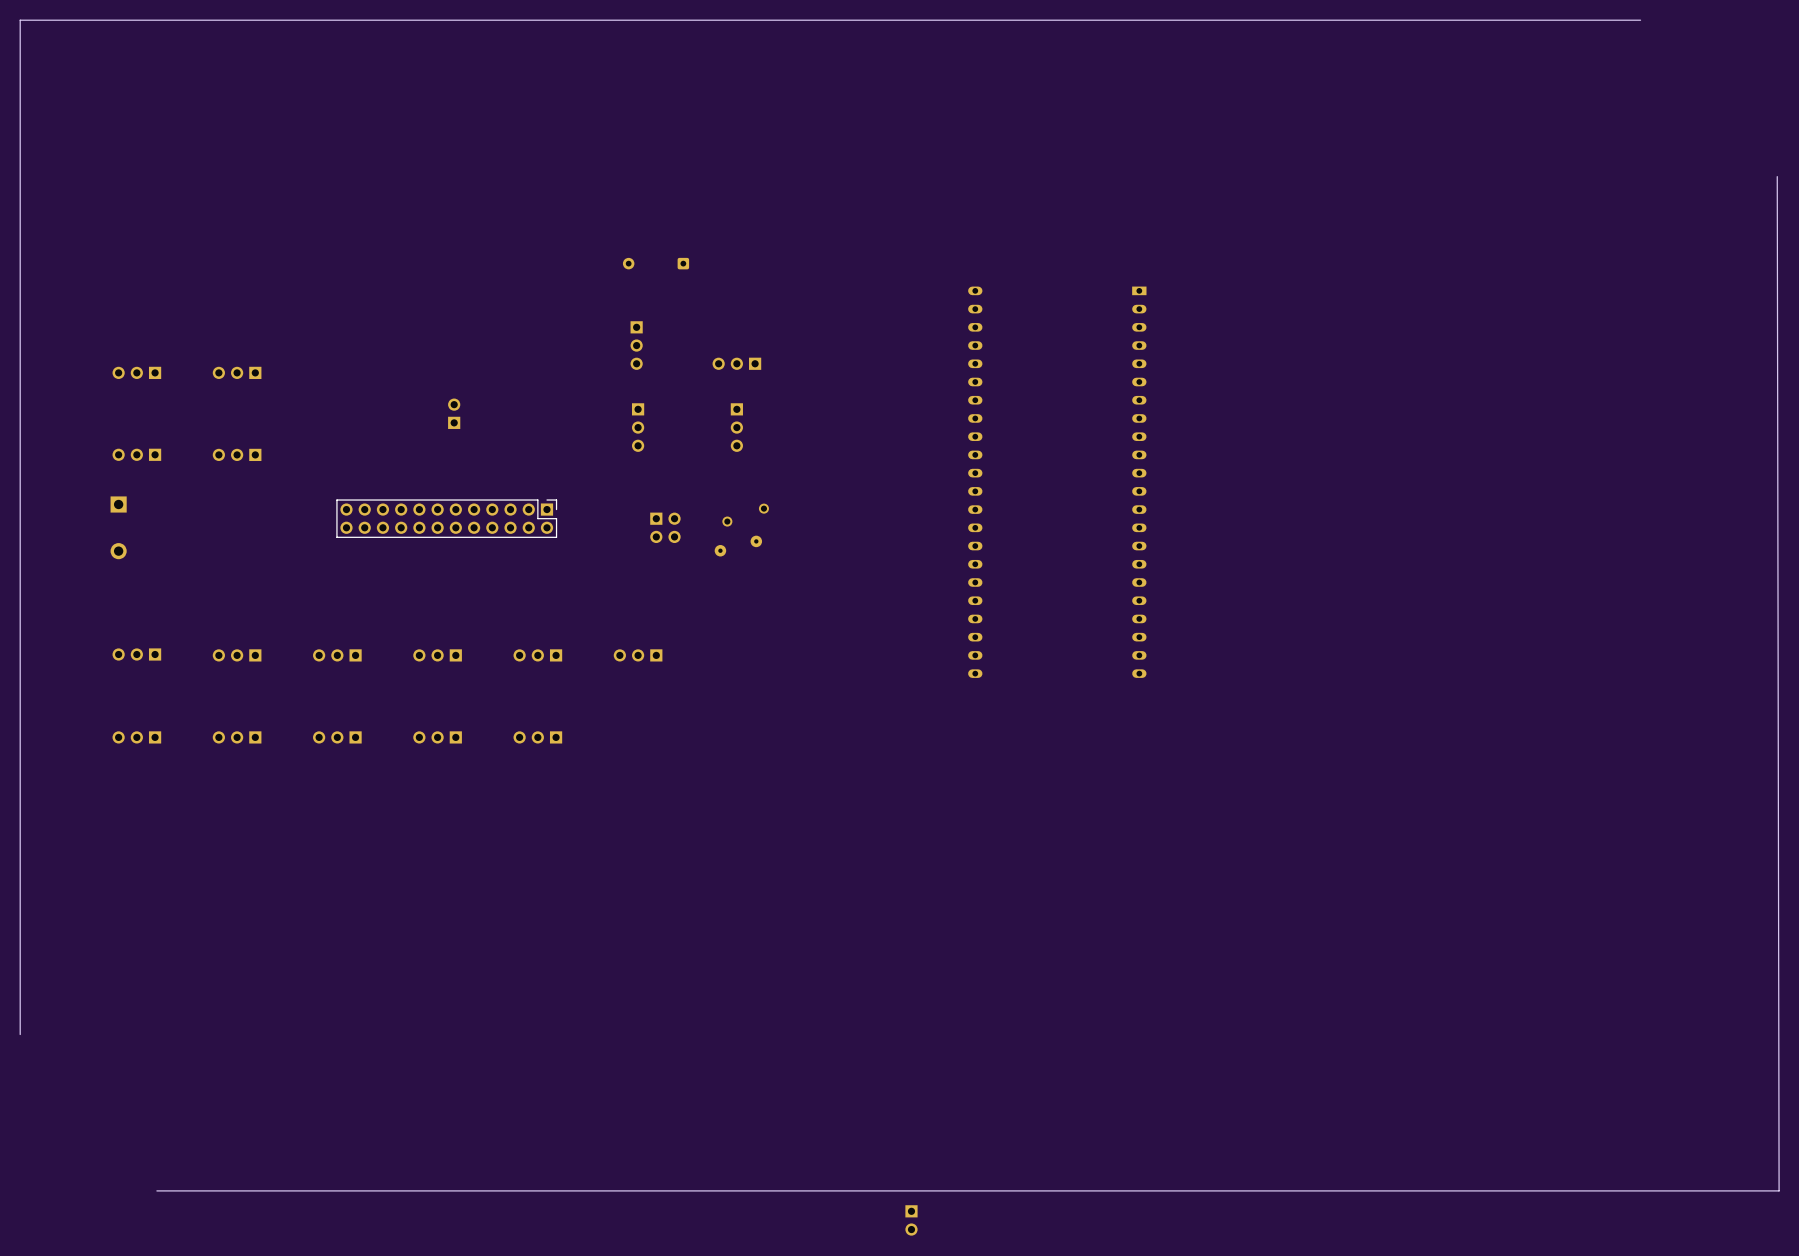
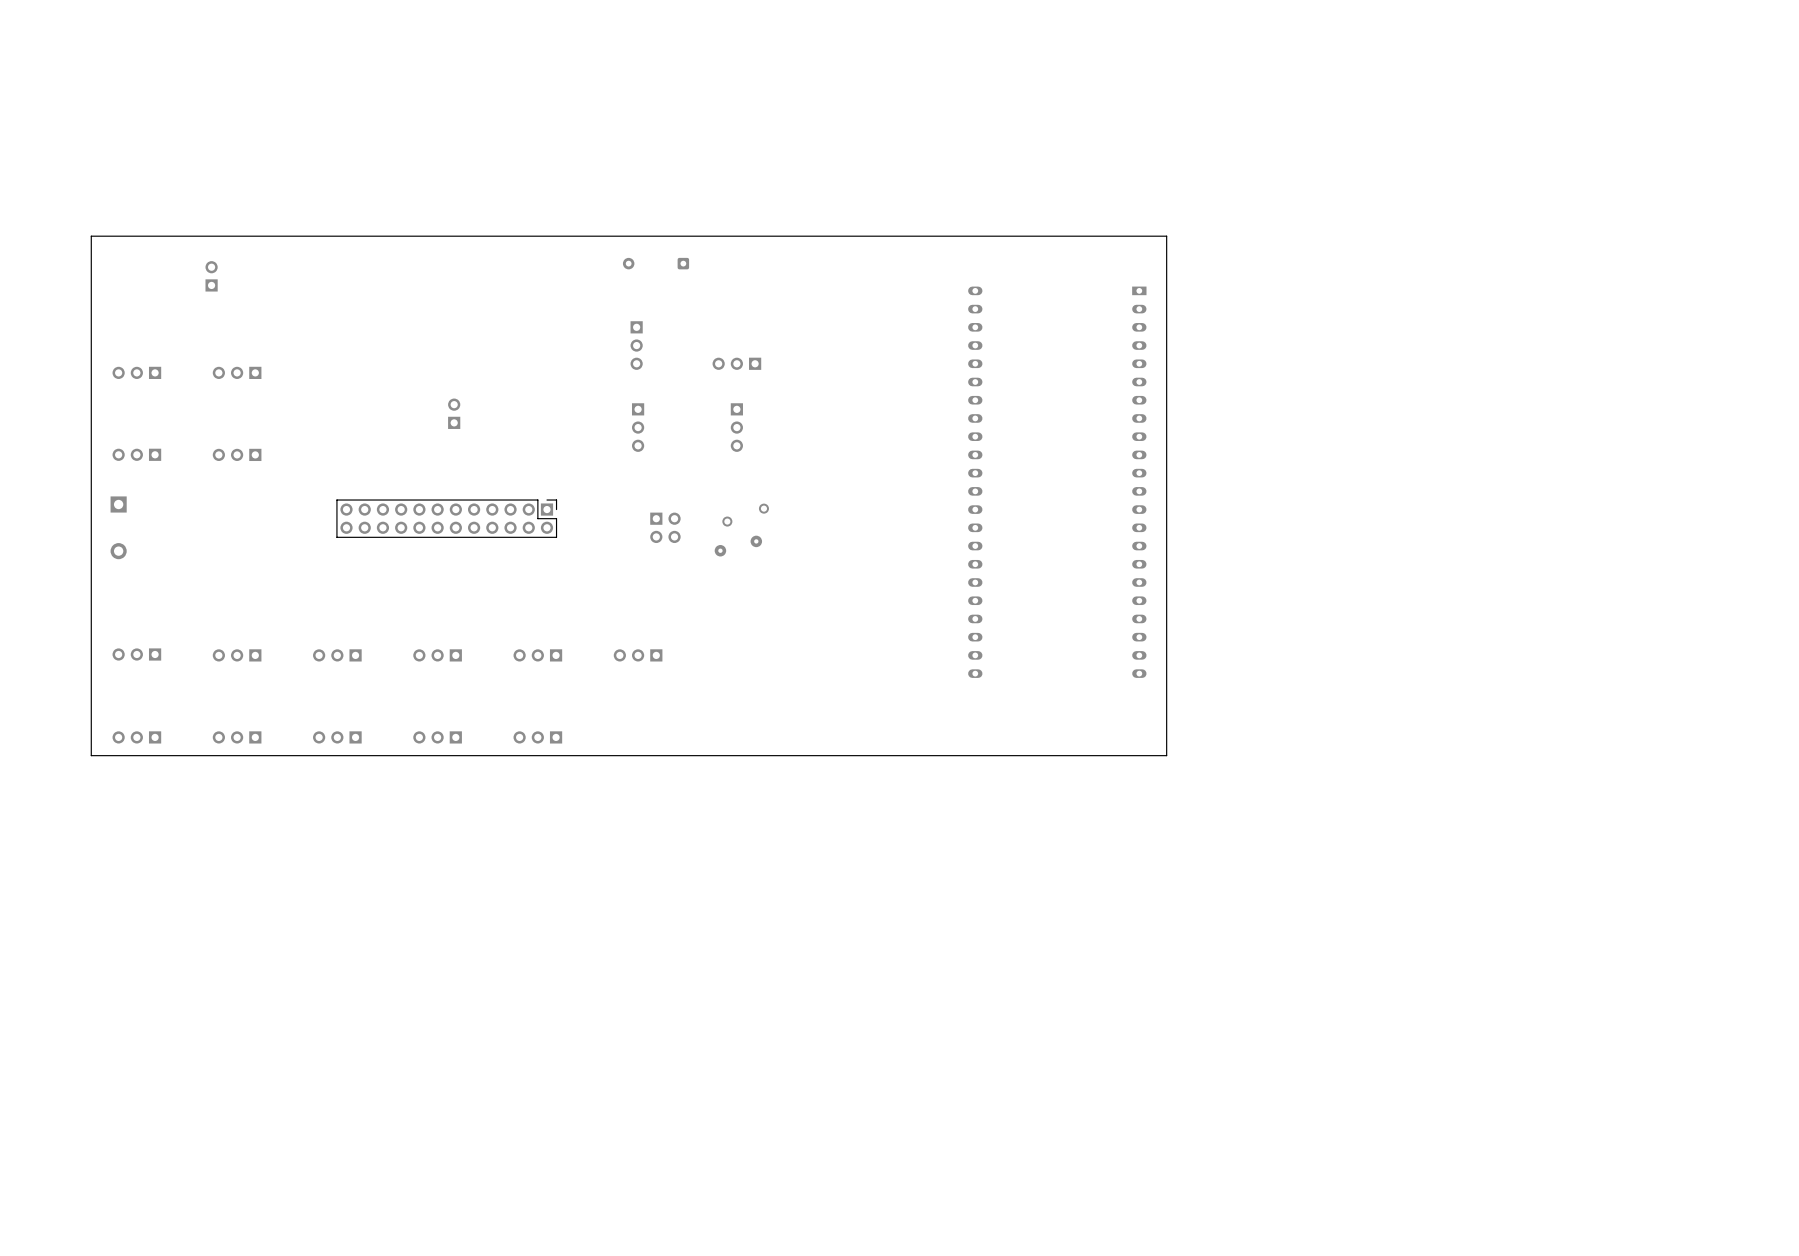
board edge: (1640, 20) (20, 20) (20, 1034) -> none
board edge: (1777, 176) (1779, 1190) (156, 1190) -> none
board edge: none -> (1166, 236) (91, 236) (91, 755) (1166, 755) (1166, 236)
part: none -> (211, 276)
part: (911, 1220) -> none

